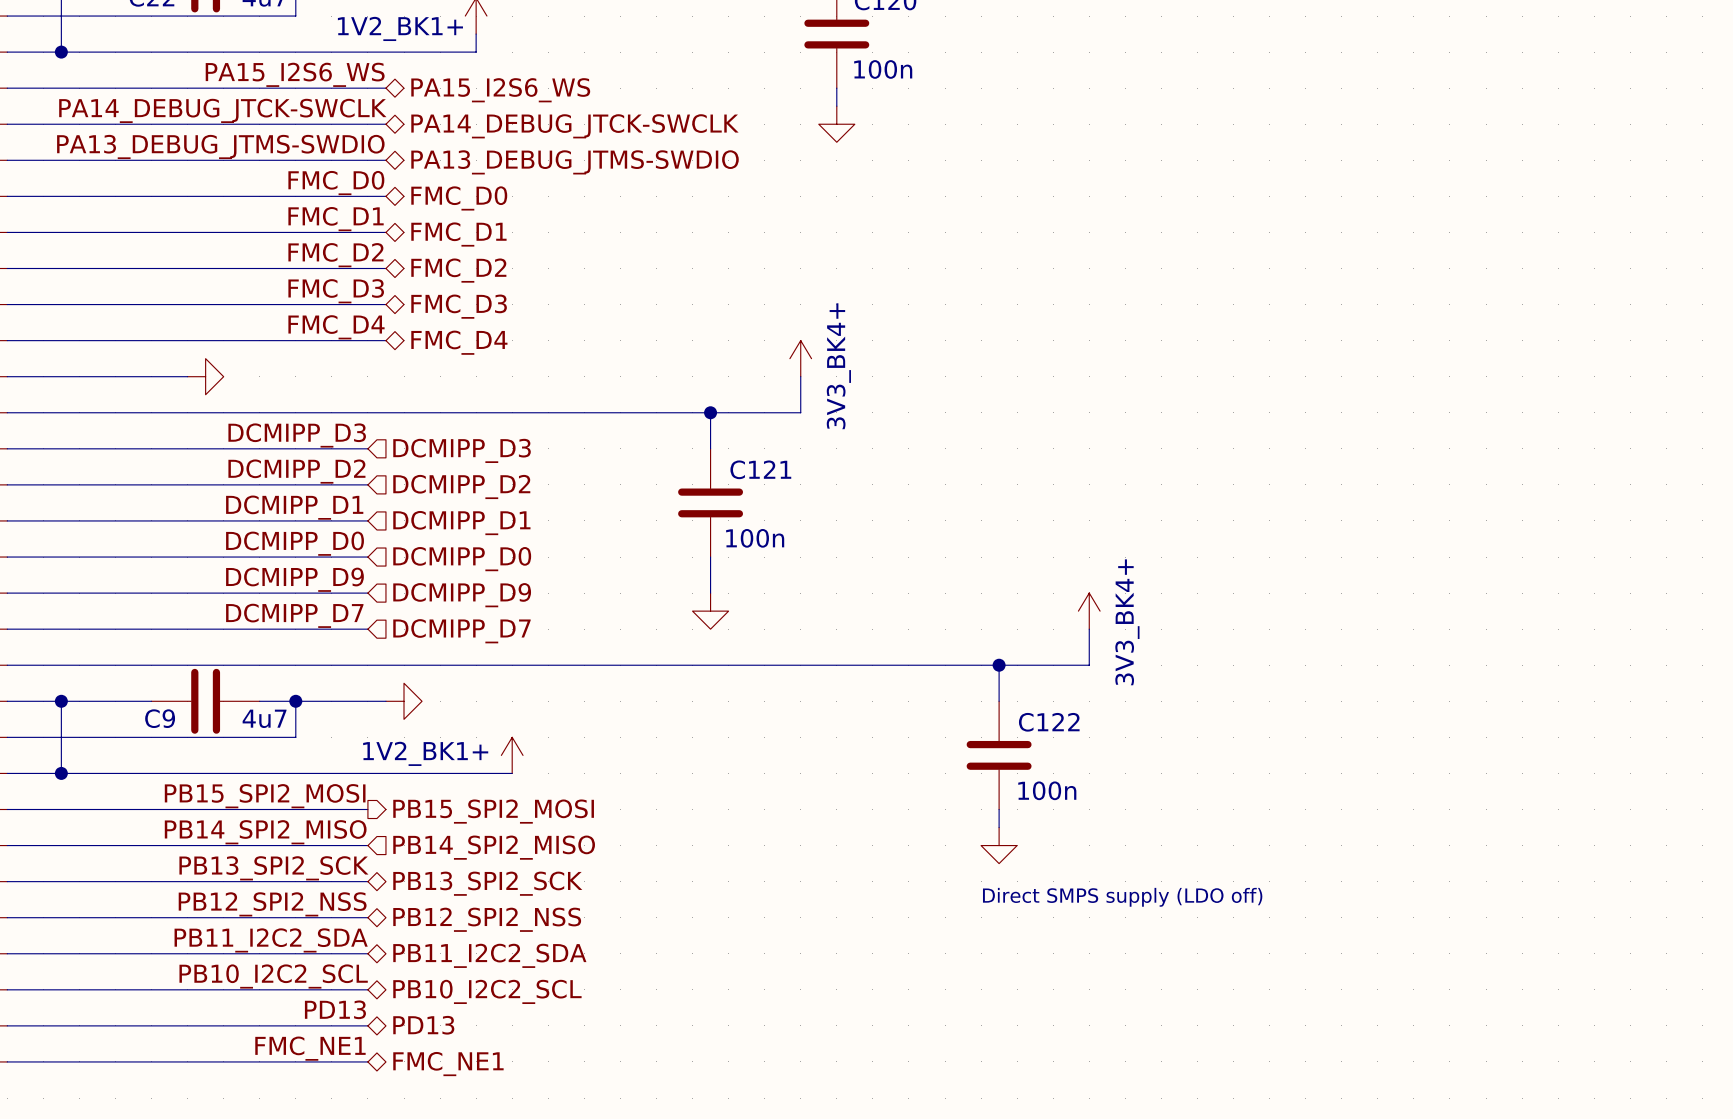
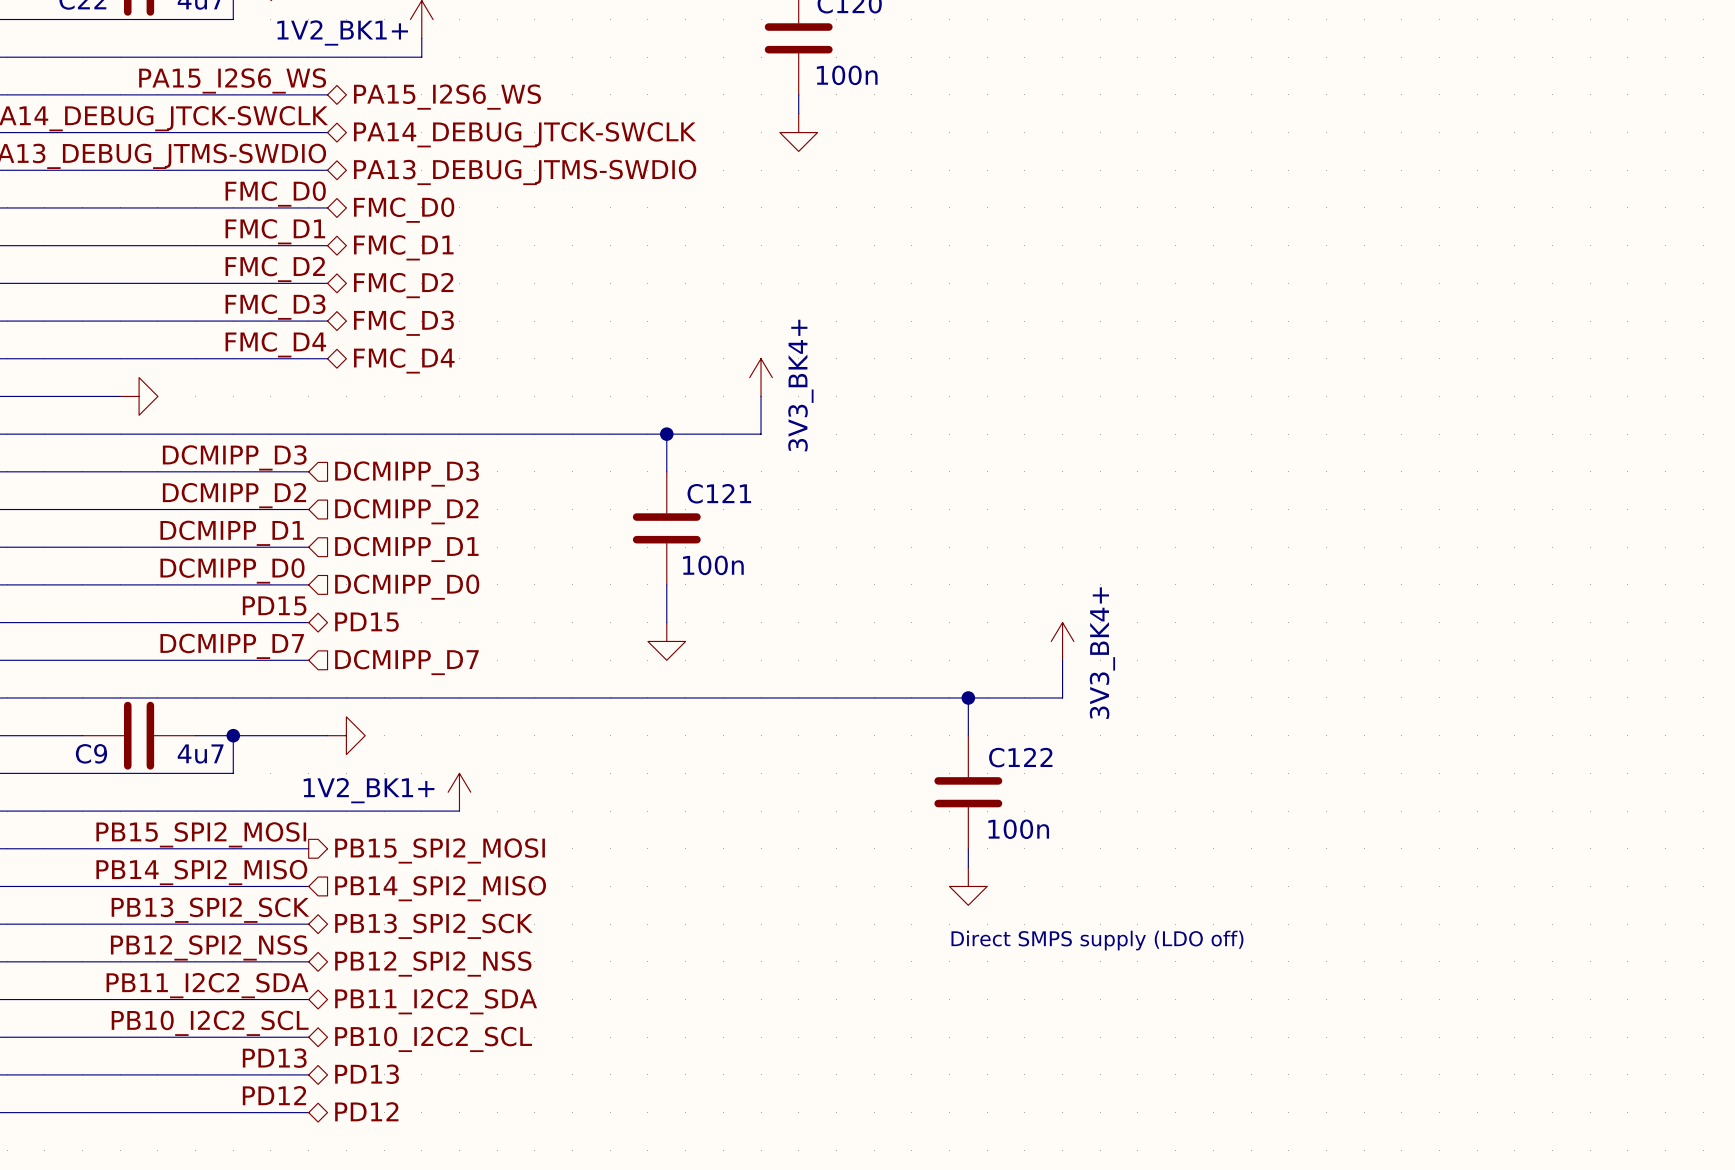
label: none -> PD15 (274, 605)
label: DCMIPP_D9 (294, 579) -> none
hierarchical label shape: input (462, 595) -> bidirectional (366, 622)
hierarchical label: DCMIPP_D9 (462, 595) -> PD15 (366, 622)
label: FMC_NE1 (310, 1048) -> PD12 (274, 1095)
hierarchical label: FMC_NE1 (448, 1064) -> PD12 (366, 1111)

